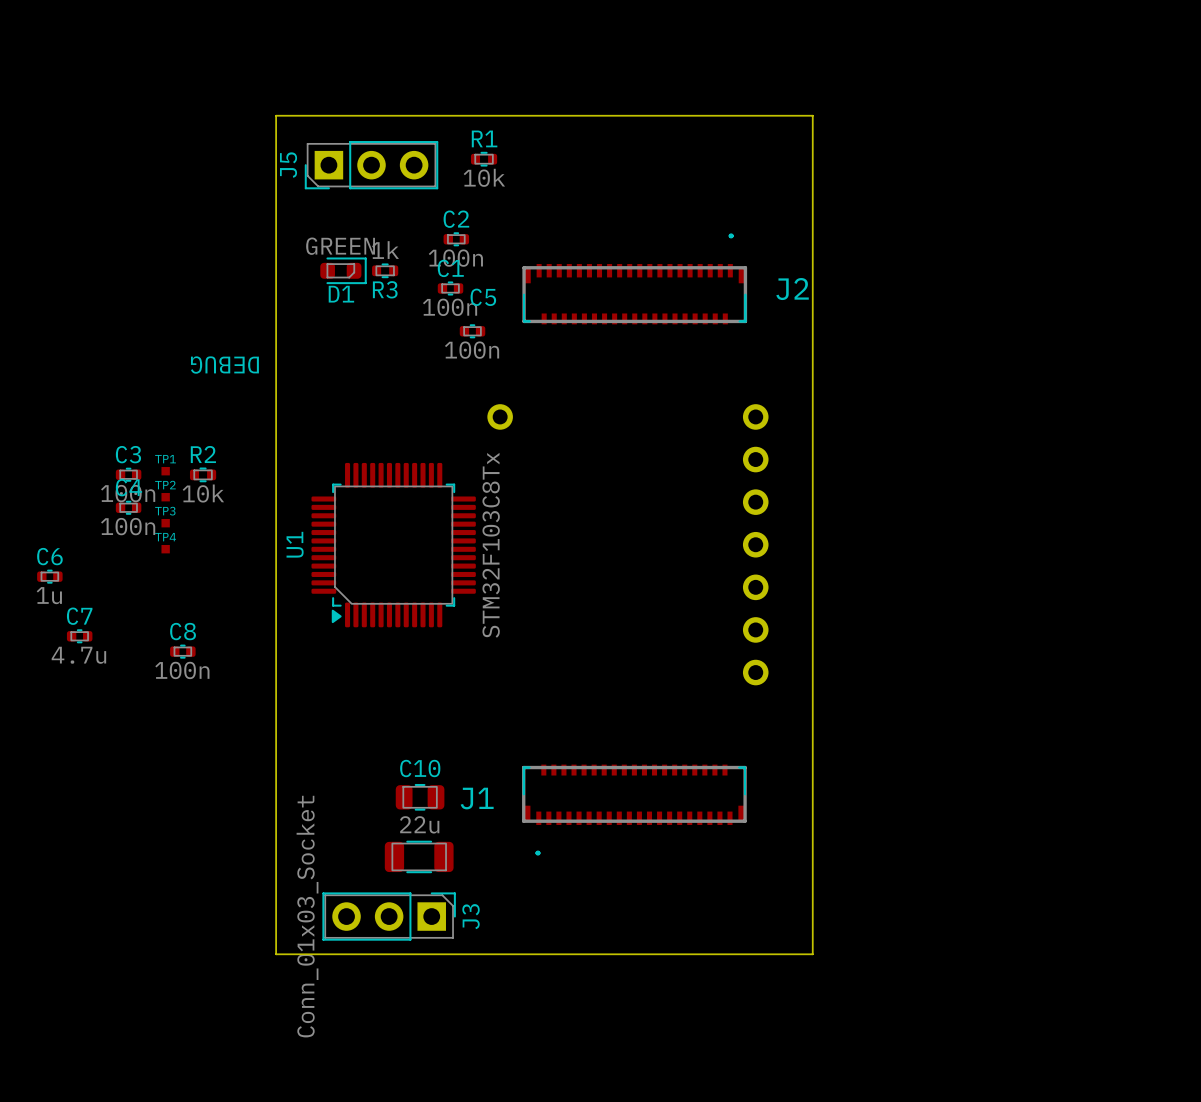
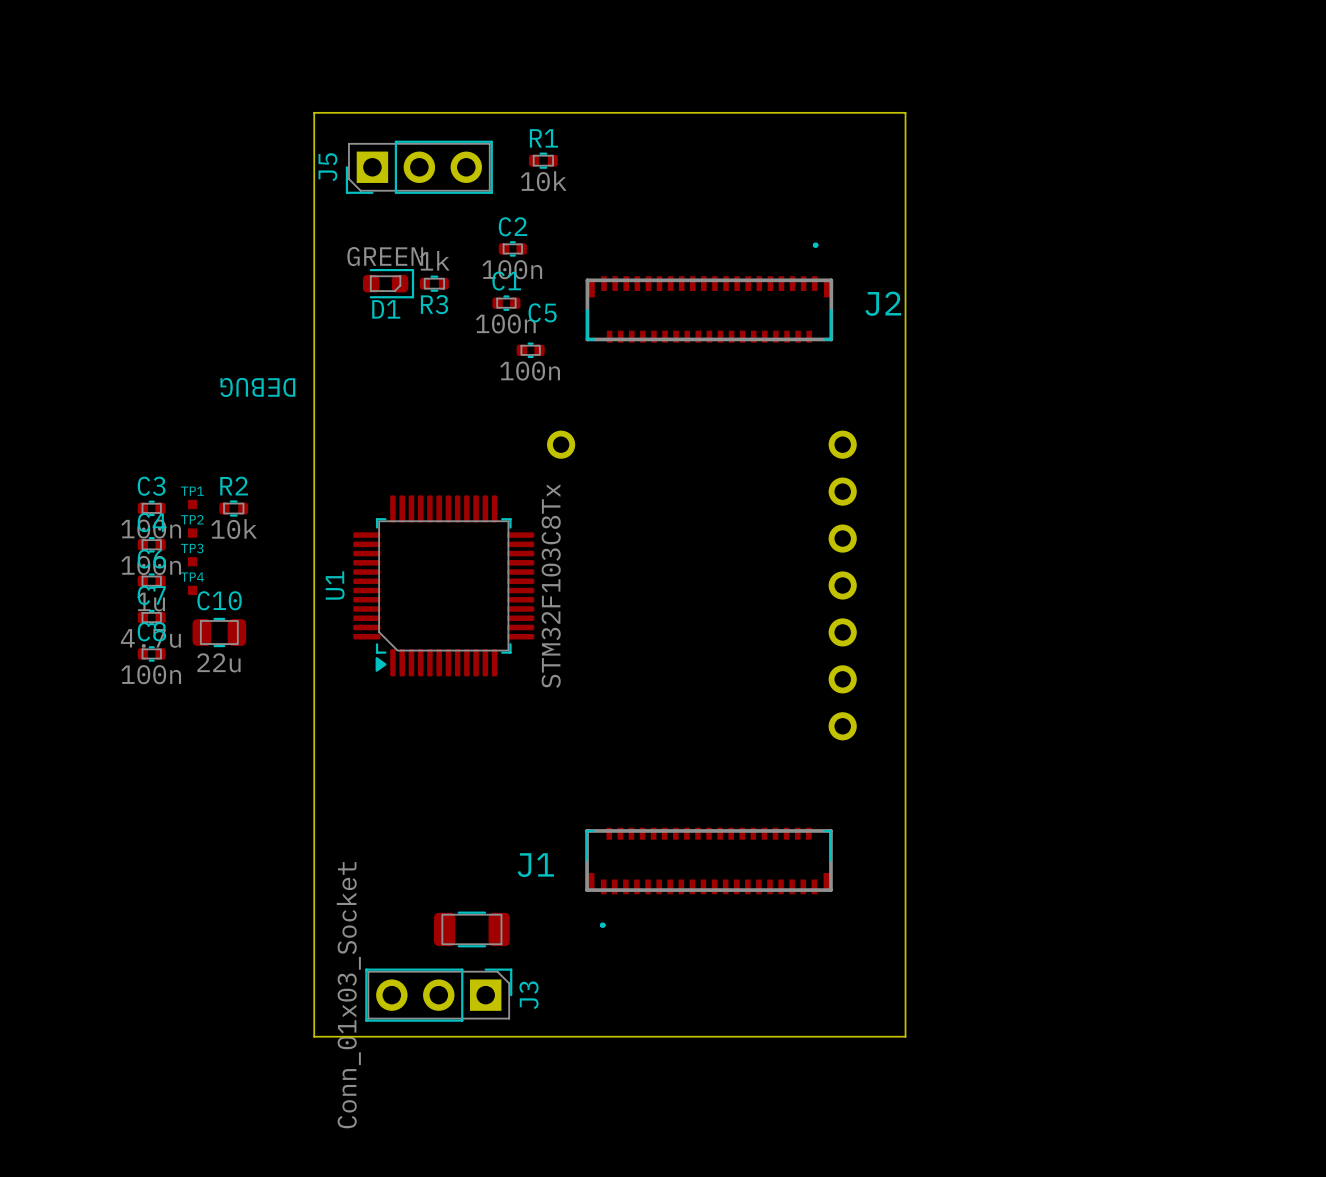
C6 position: (49, 576) -> (151, 581)
C7 position: (79, 636) -> (151, 617)
C8 position: (182, 651) -> (151, 653)
C10 position: (420, 797) -> (219, 632)

